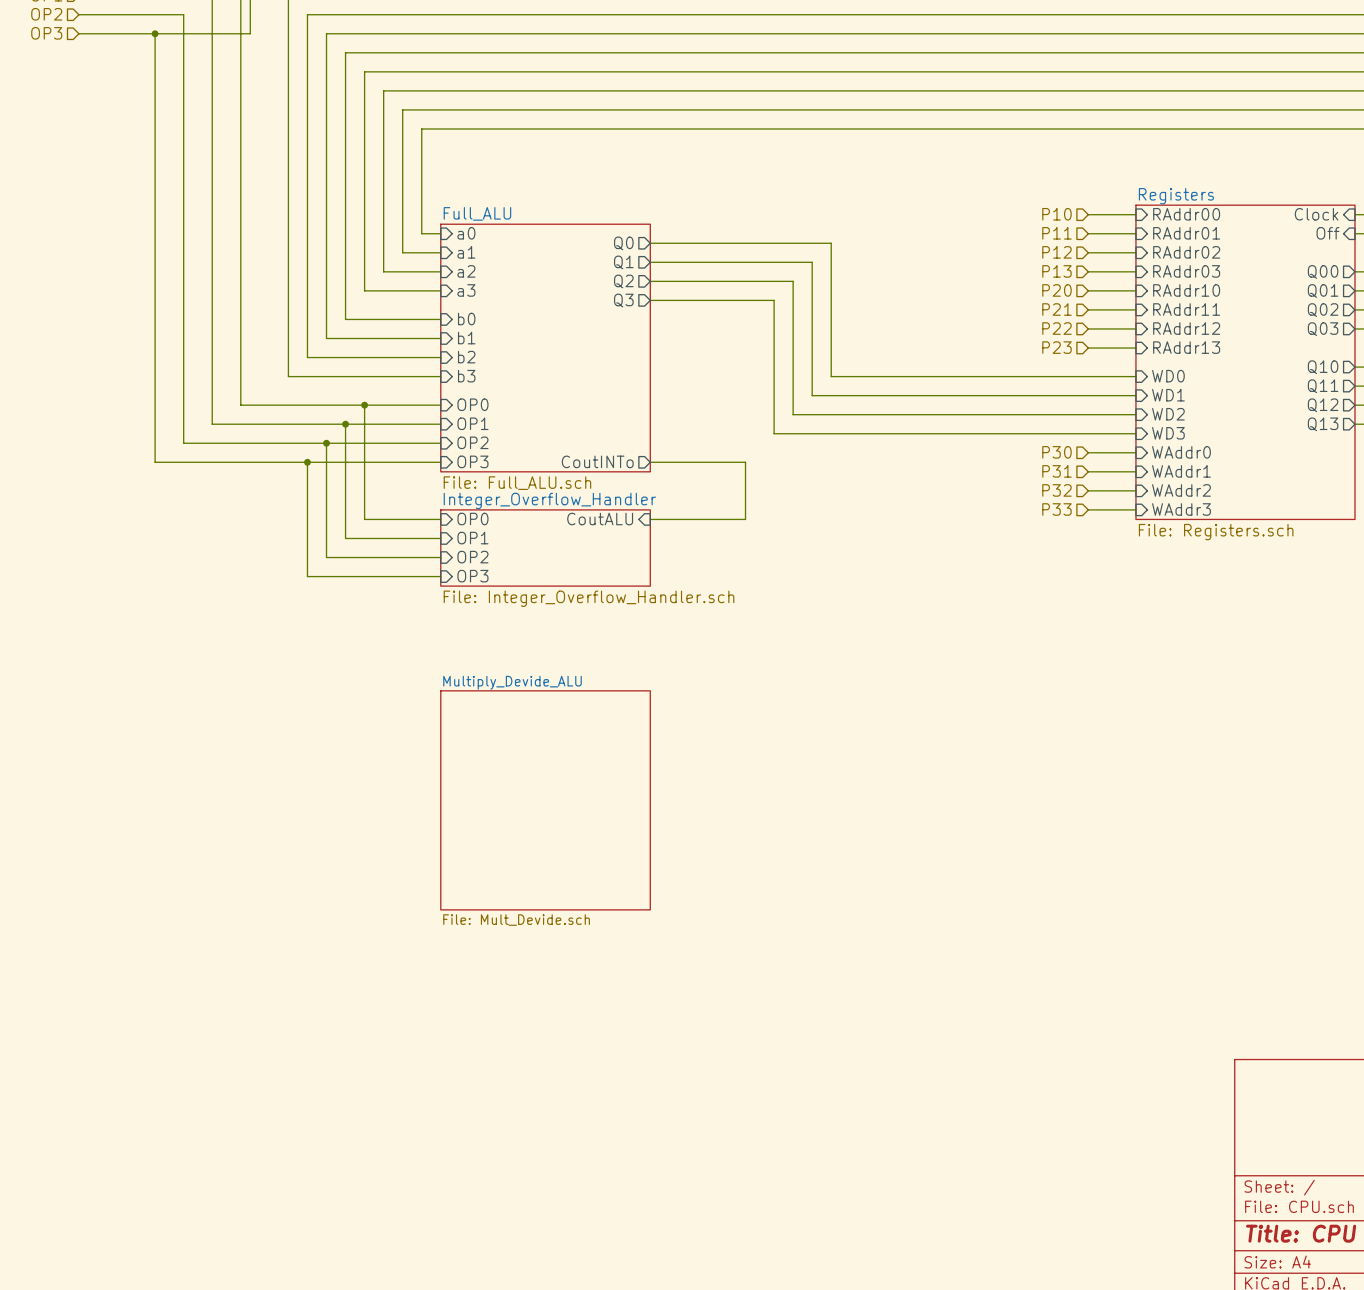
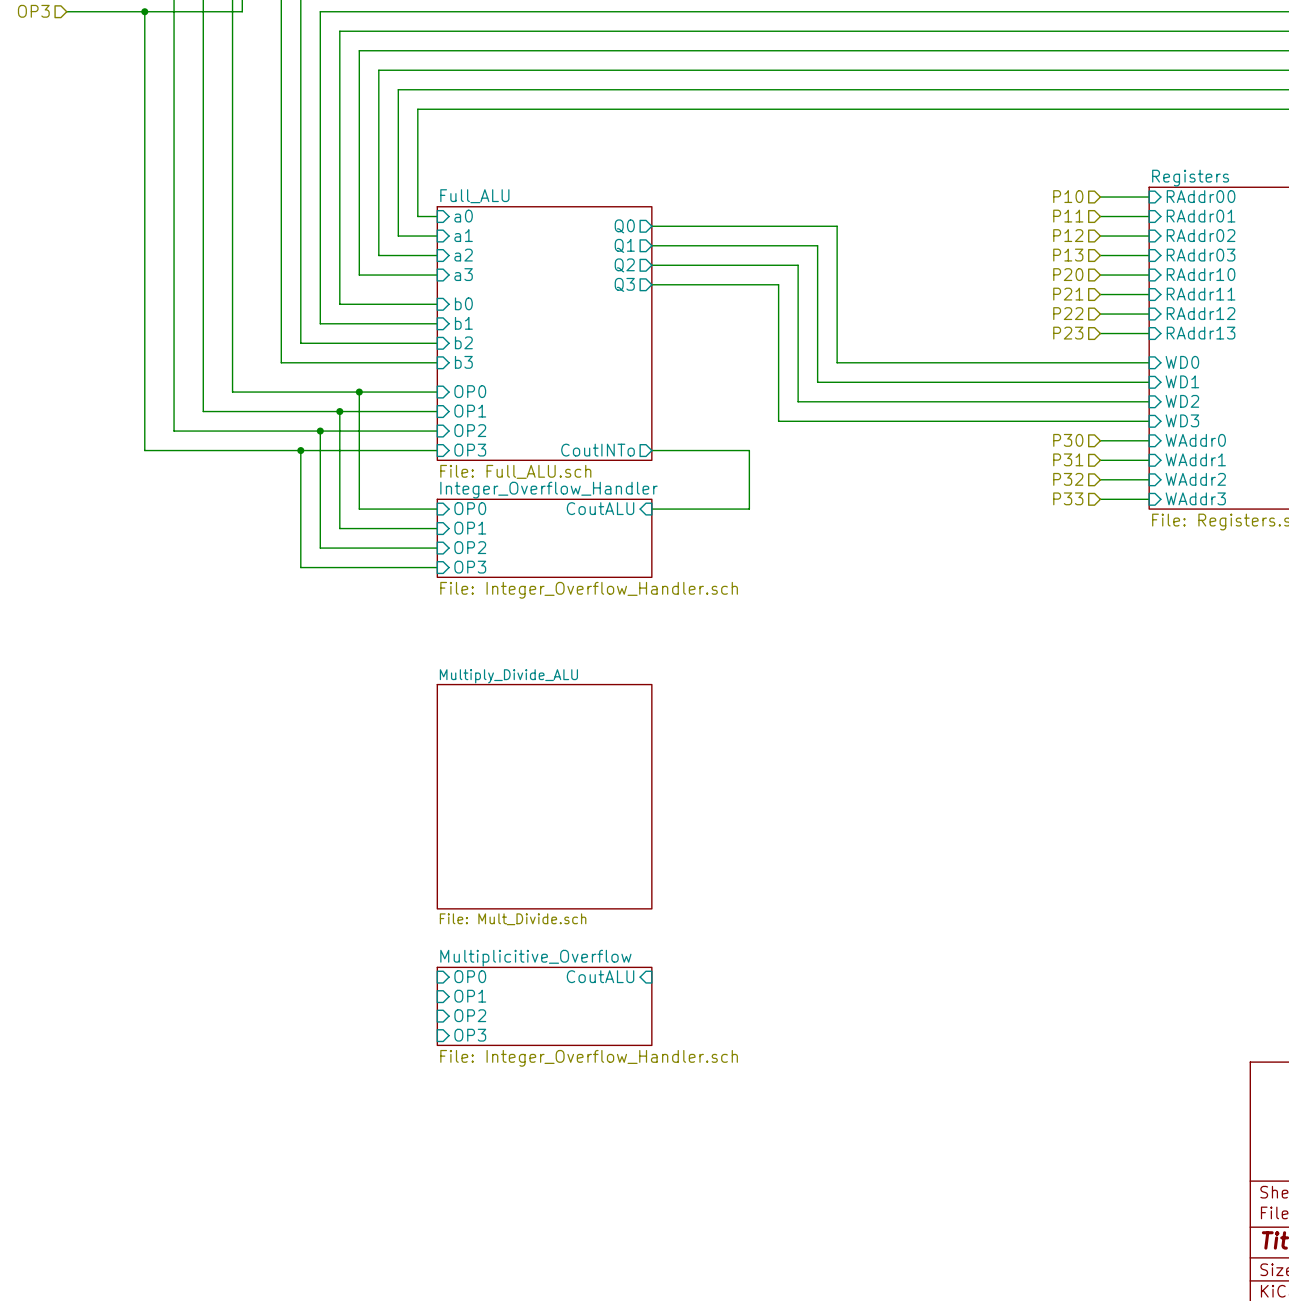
sheet Multiply_Devide_ALU name: Multiply_Devide_ALU (512, 682) -> Multiply_Divide_ALU (508, 676)
sheet Multiply_Devide_ALU value: File: Mult_Devide.sch (516, 920) -> File: Mult_Divide.sch (513, 919)
sheet pin: none -> OP0 (470, 976)
sheet pin: none -> CoutALU (600, 976)
sheet pin: none -> OP1 (470, 996)
sheet Multiplicitive_Overflow: none -> File: Integer_Overflow_Handler.sch (544, 1006)
sheet pin: none -> OP2 (470, 1015)
sheet pin: none -> OP3 (470, 1035)

